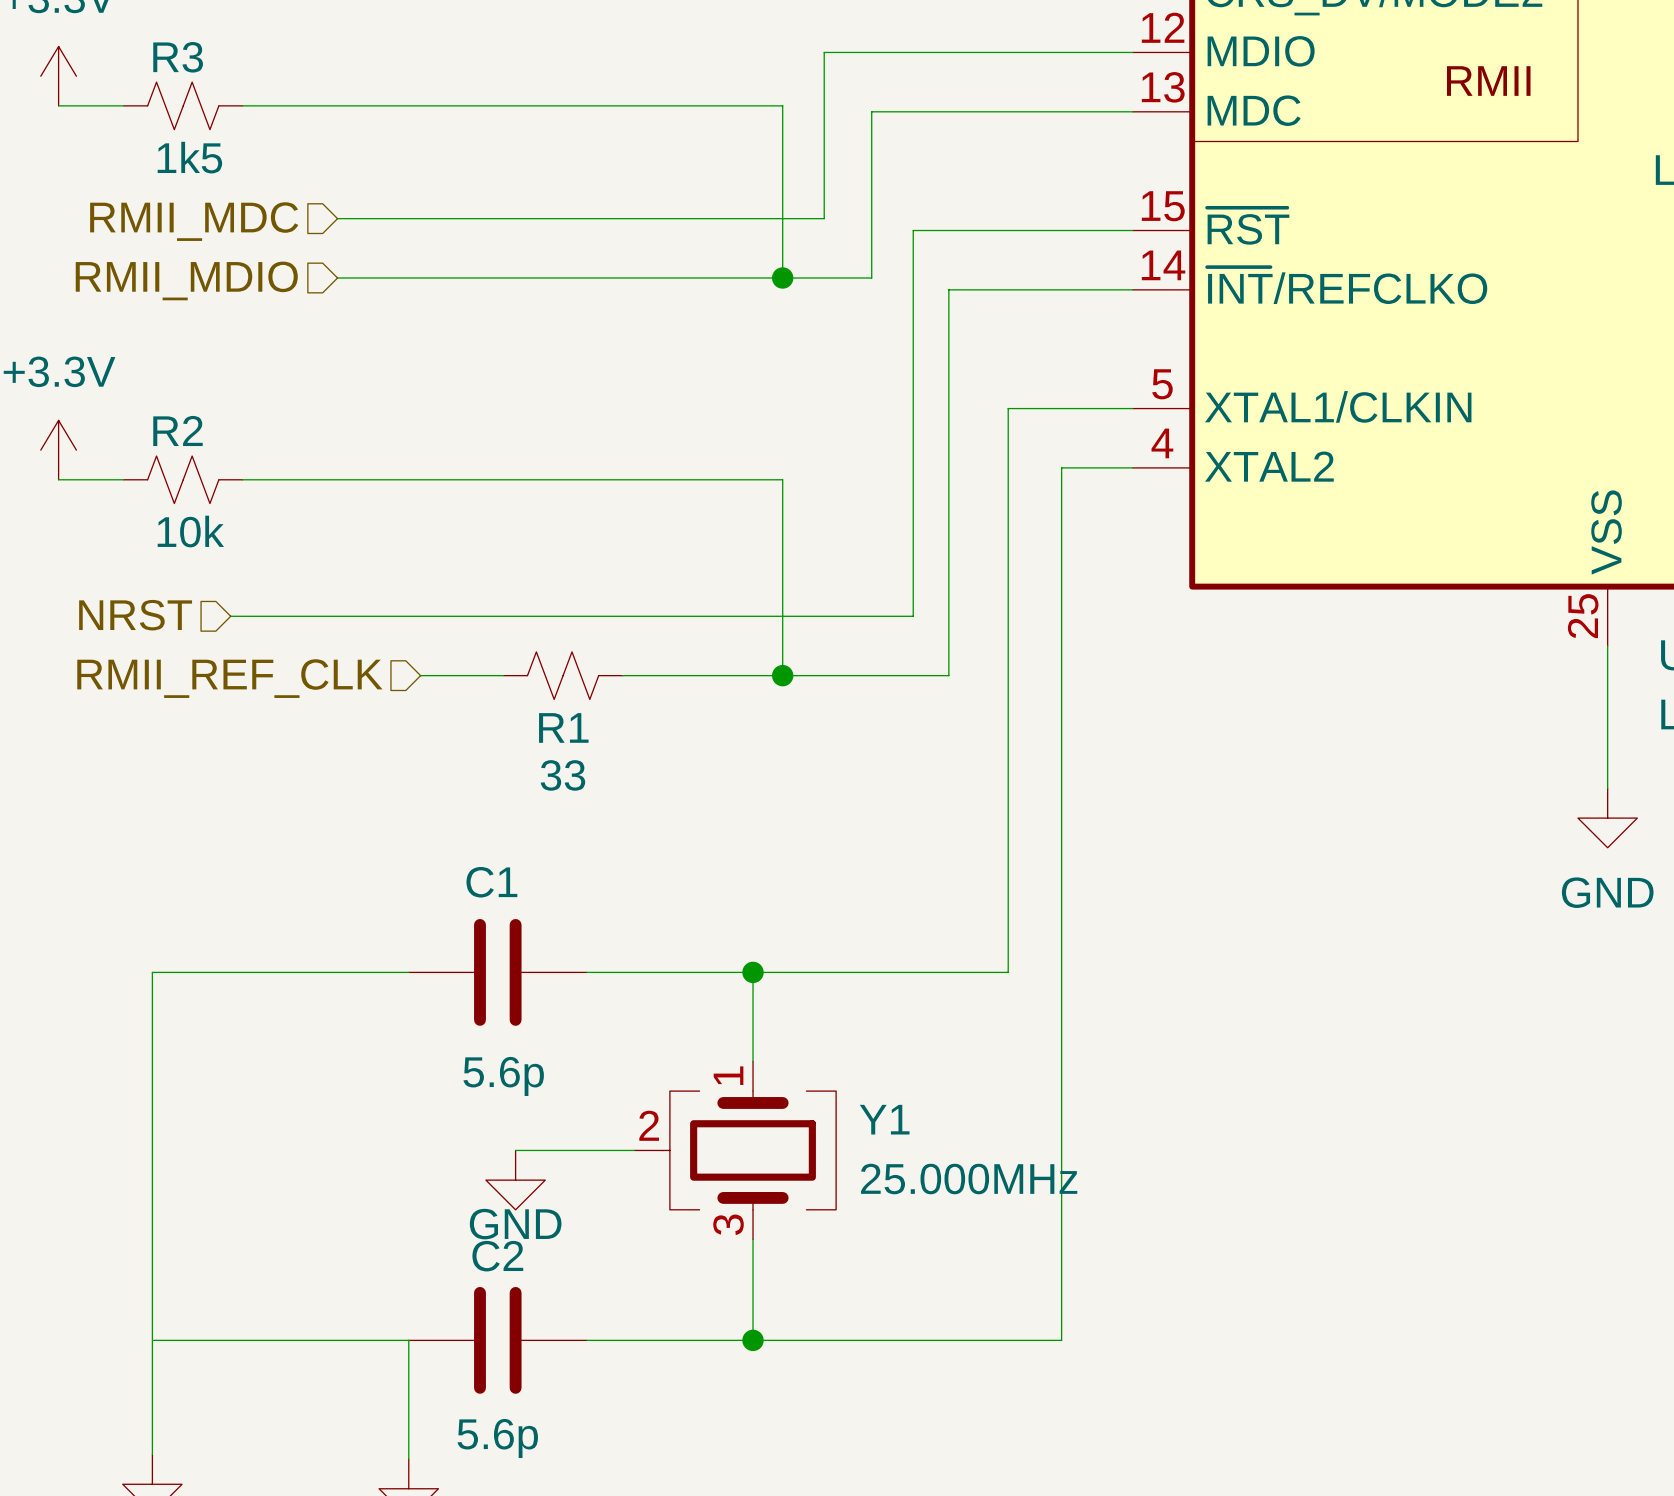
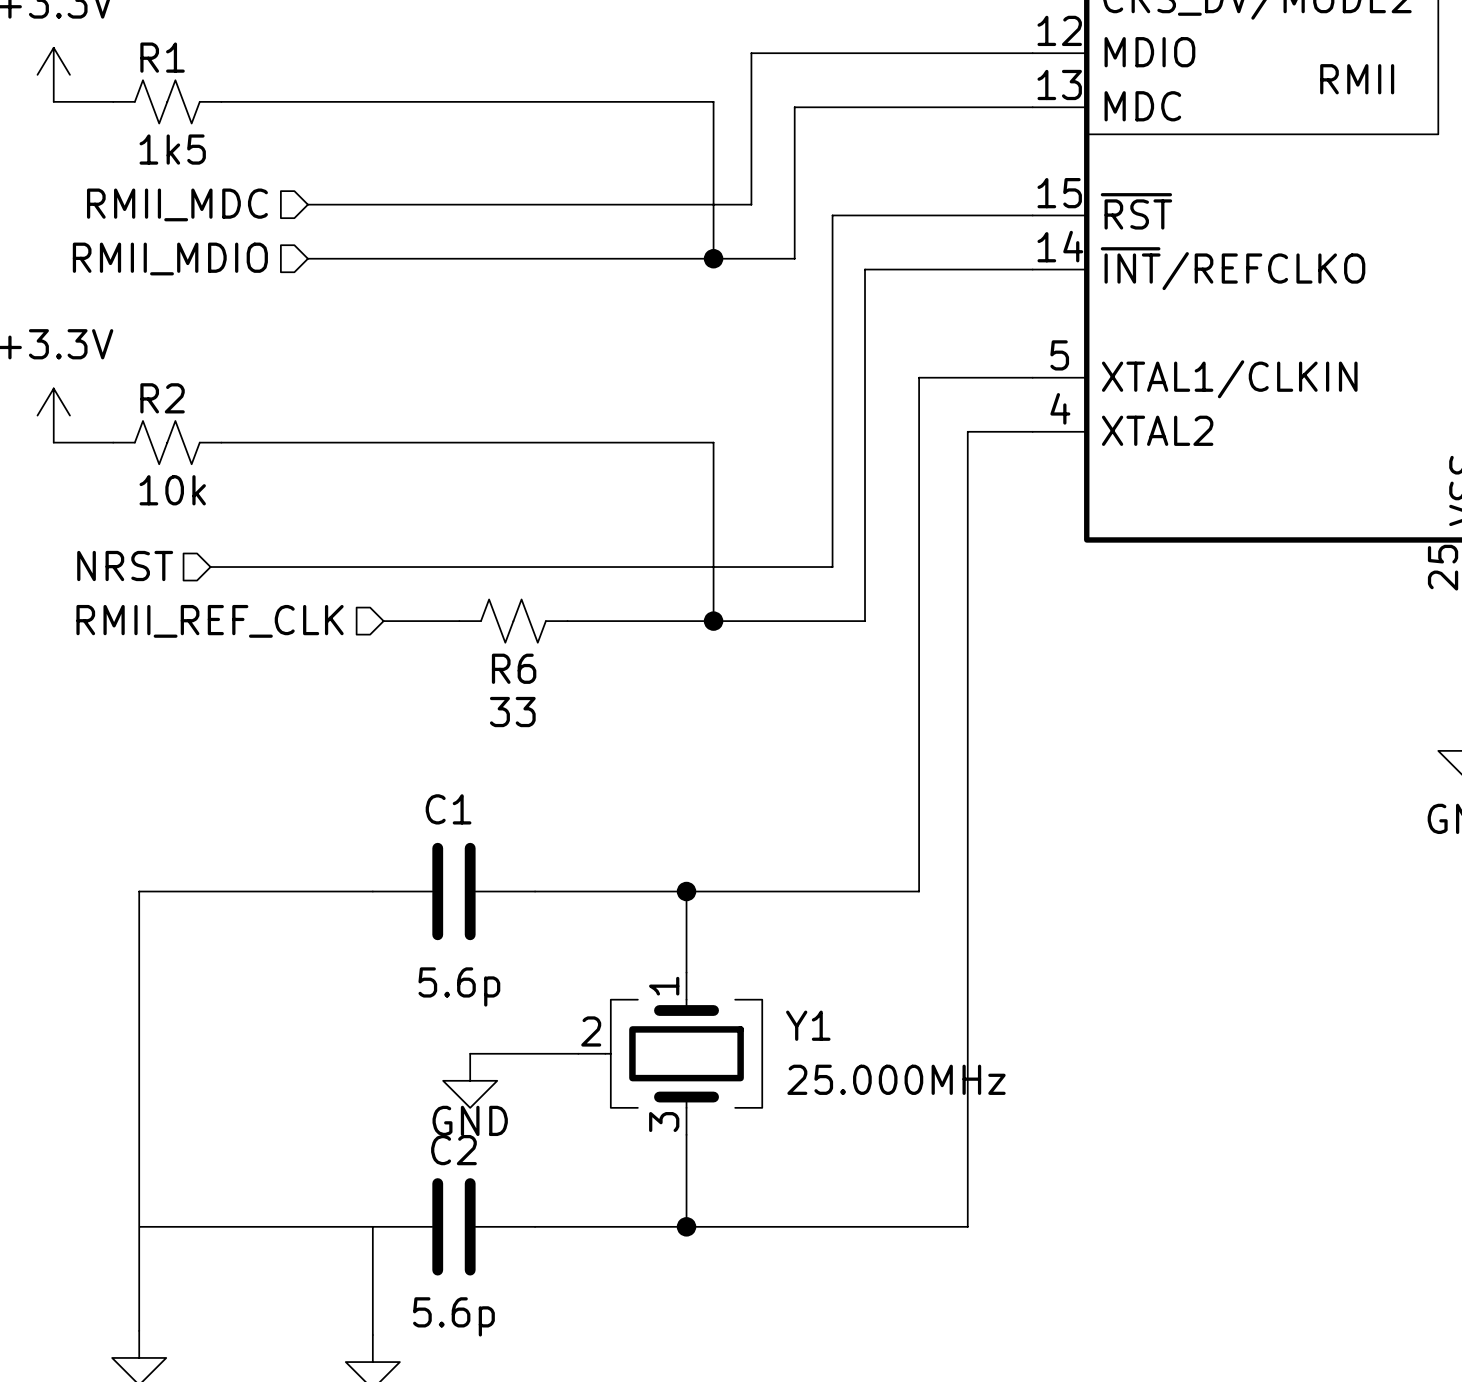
R3 name: R3 (178, 57) -> R1 (162, 57)
R1 name: R1 (563, 727) -> R6 (514, 668)

